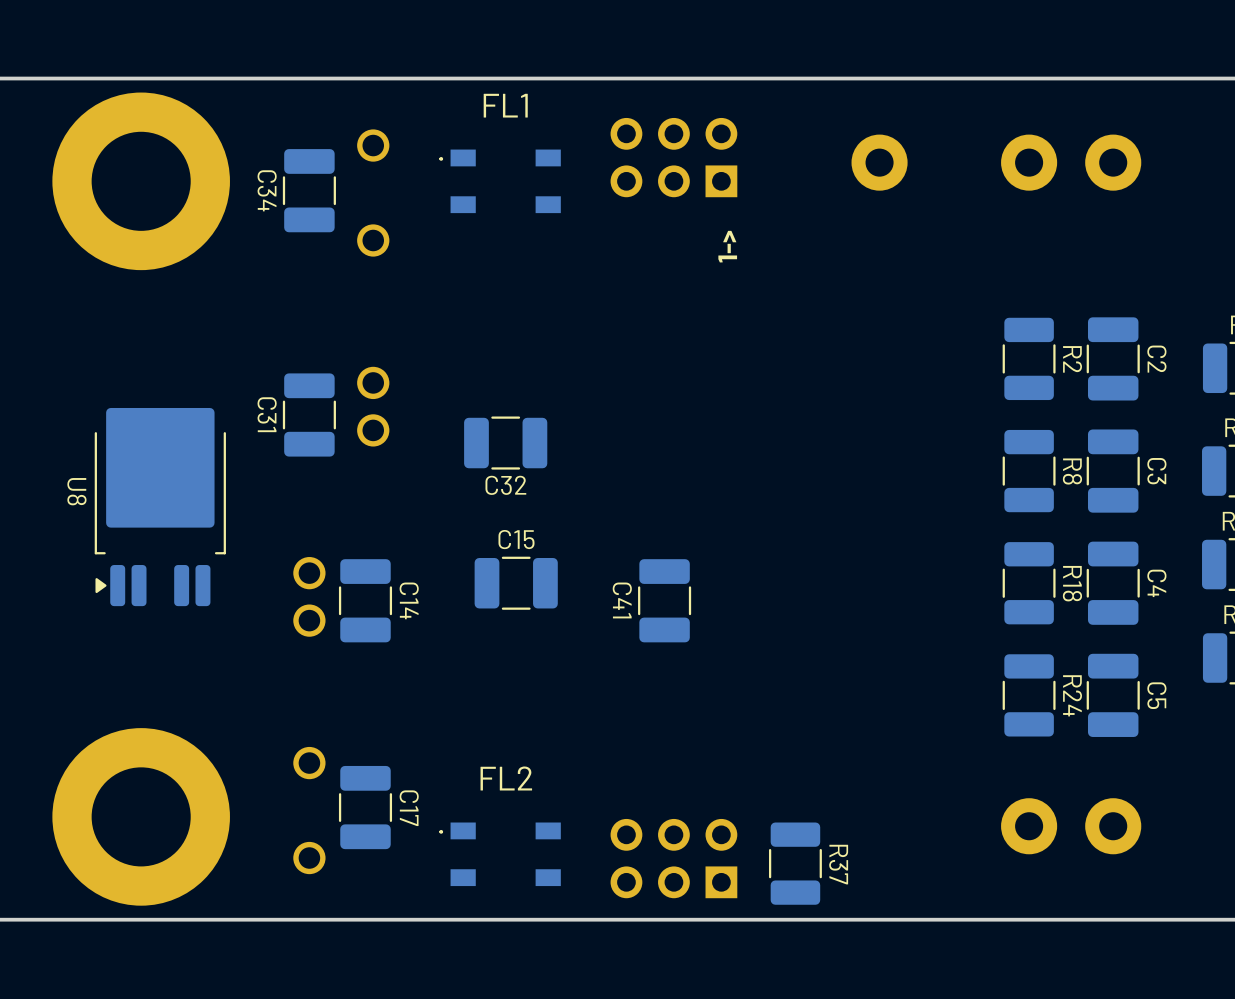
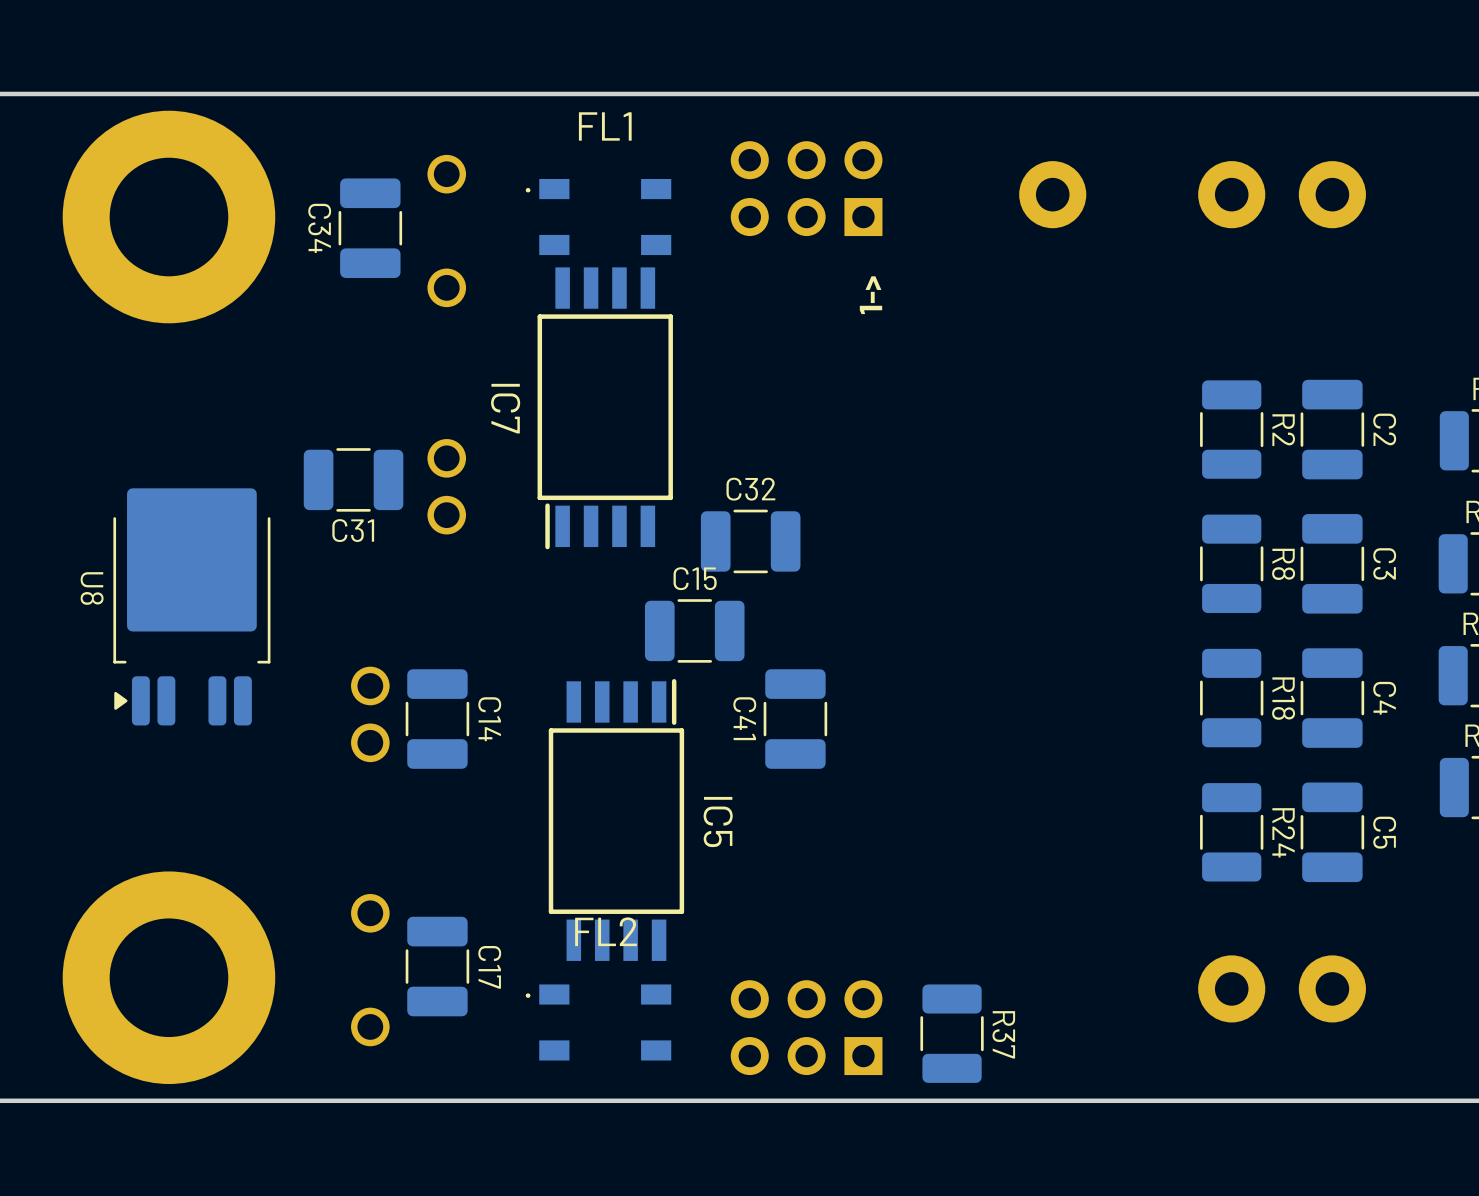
IC7: none -> (605, 408)
C31 name position: C31 (267, 414) -> C31 (353, 530)
C31 rotation: 0° (309, 414) -> 90° clockwise (353, 479)
C32 position: (505, 443) -> (750, 541)
C32 name position: C32 (505, 485) -> C32 (750, 489)
C15 position: (516, 583) -> (694, 630)
IC5: none -> (616, 820)

